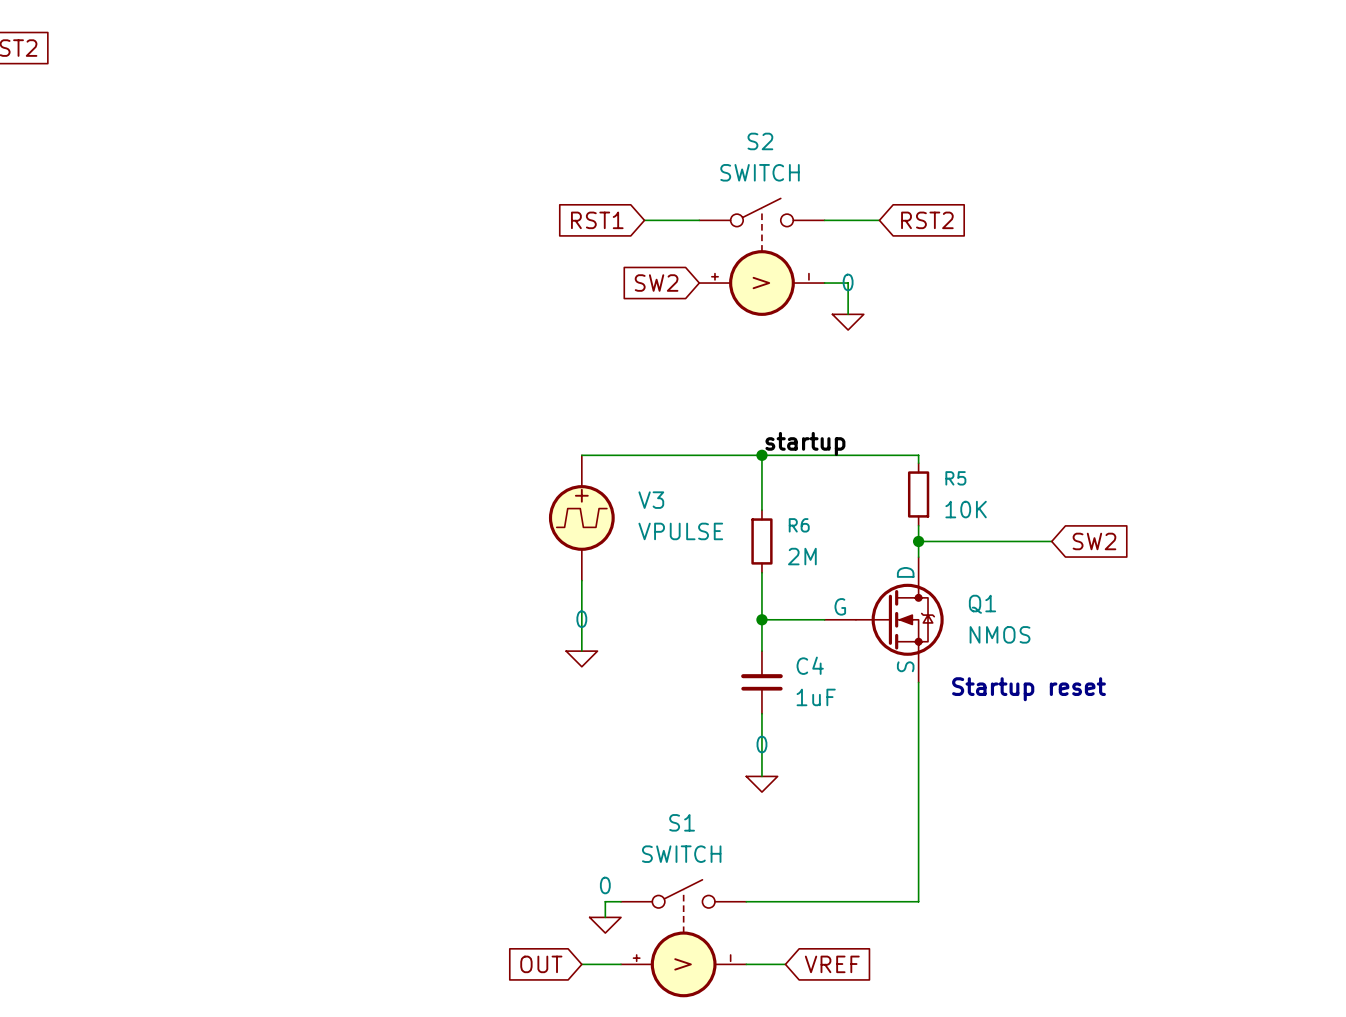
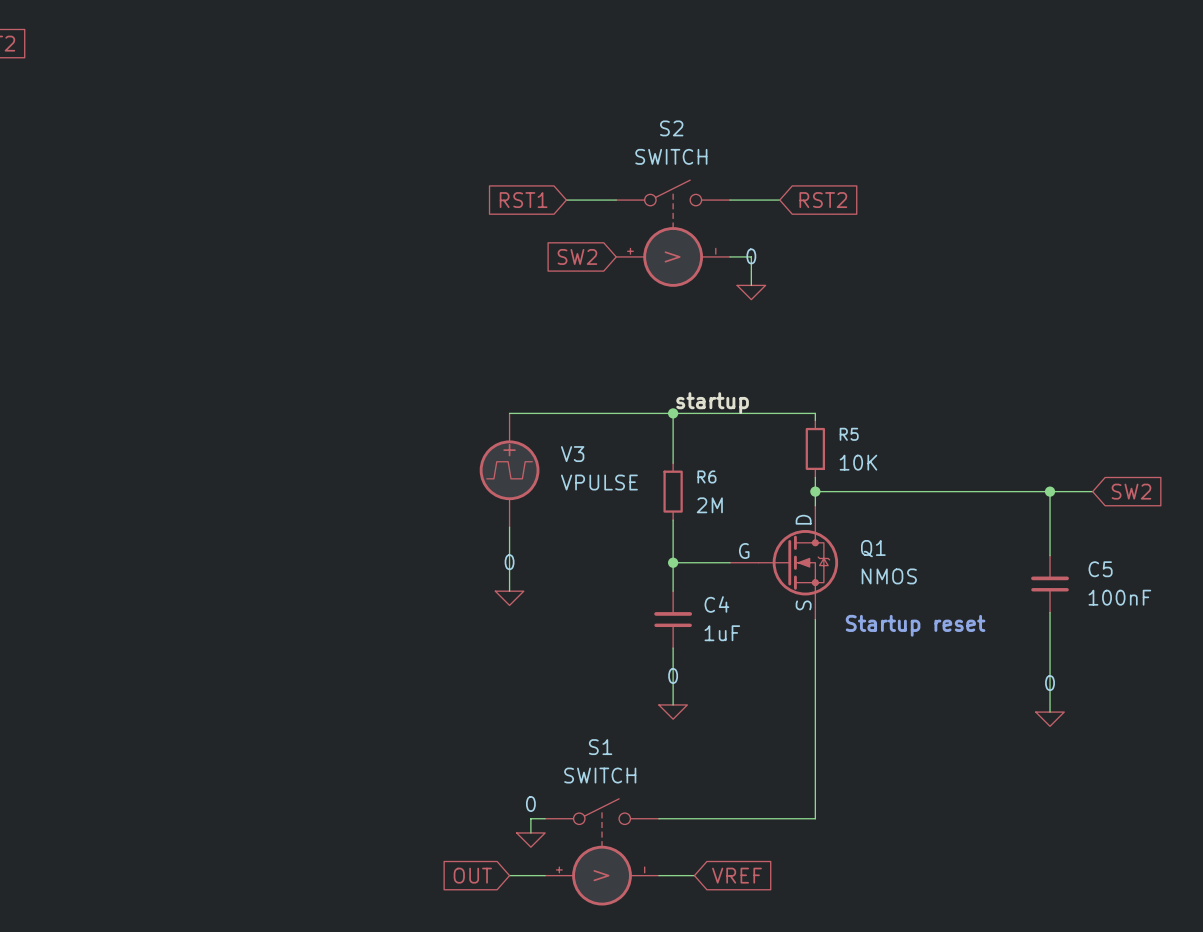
wire: none -> (936, 491) (1092, 491)
global label position: SW2 (1094, 541) -> SW2 (1131, 491)
wire: none -> (1050, 491) (1050, 555)
junction: none -> (1050, 491)
C5: none -> 100nF (1050, 584)
wire: none -> (1050, 612) (1050, 712)
power symbol: none -> 0 (1050, 719)

